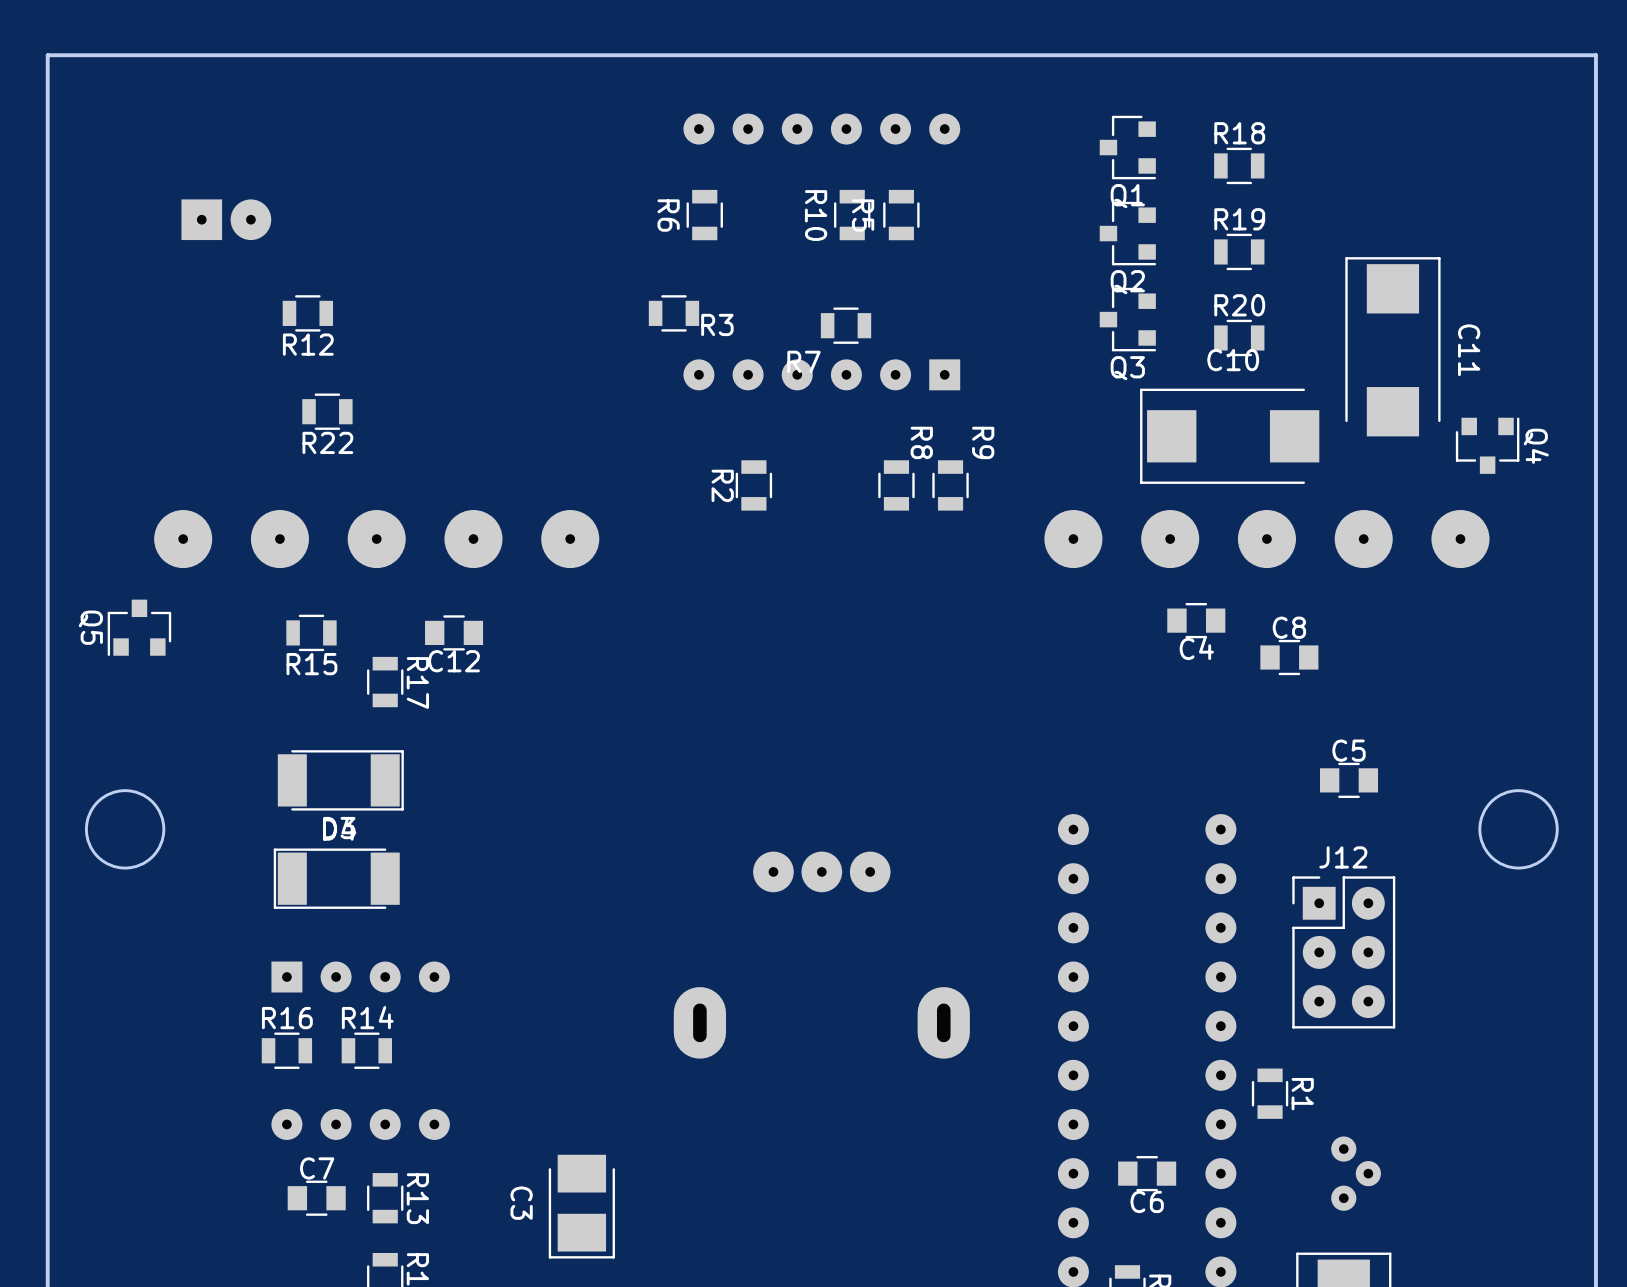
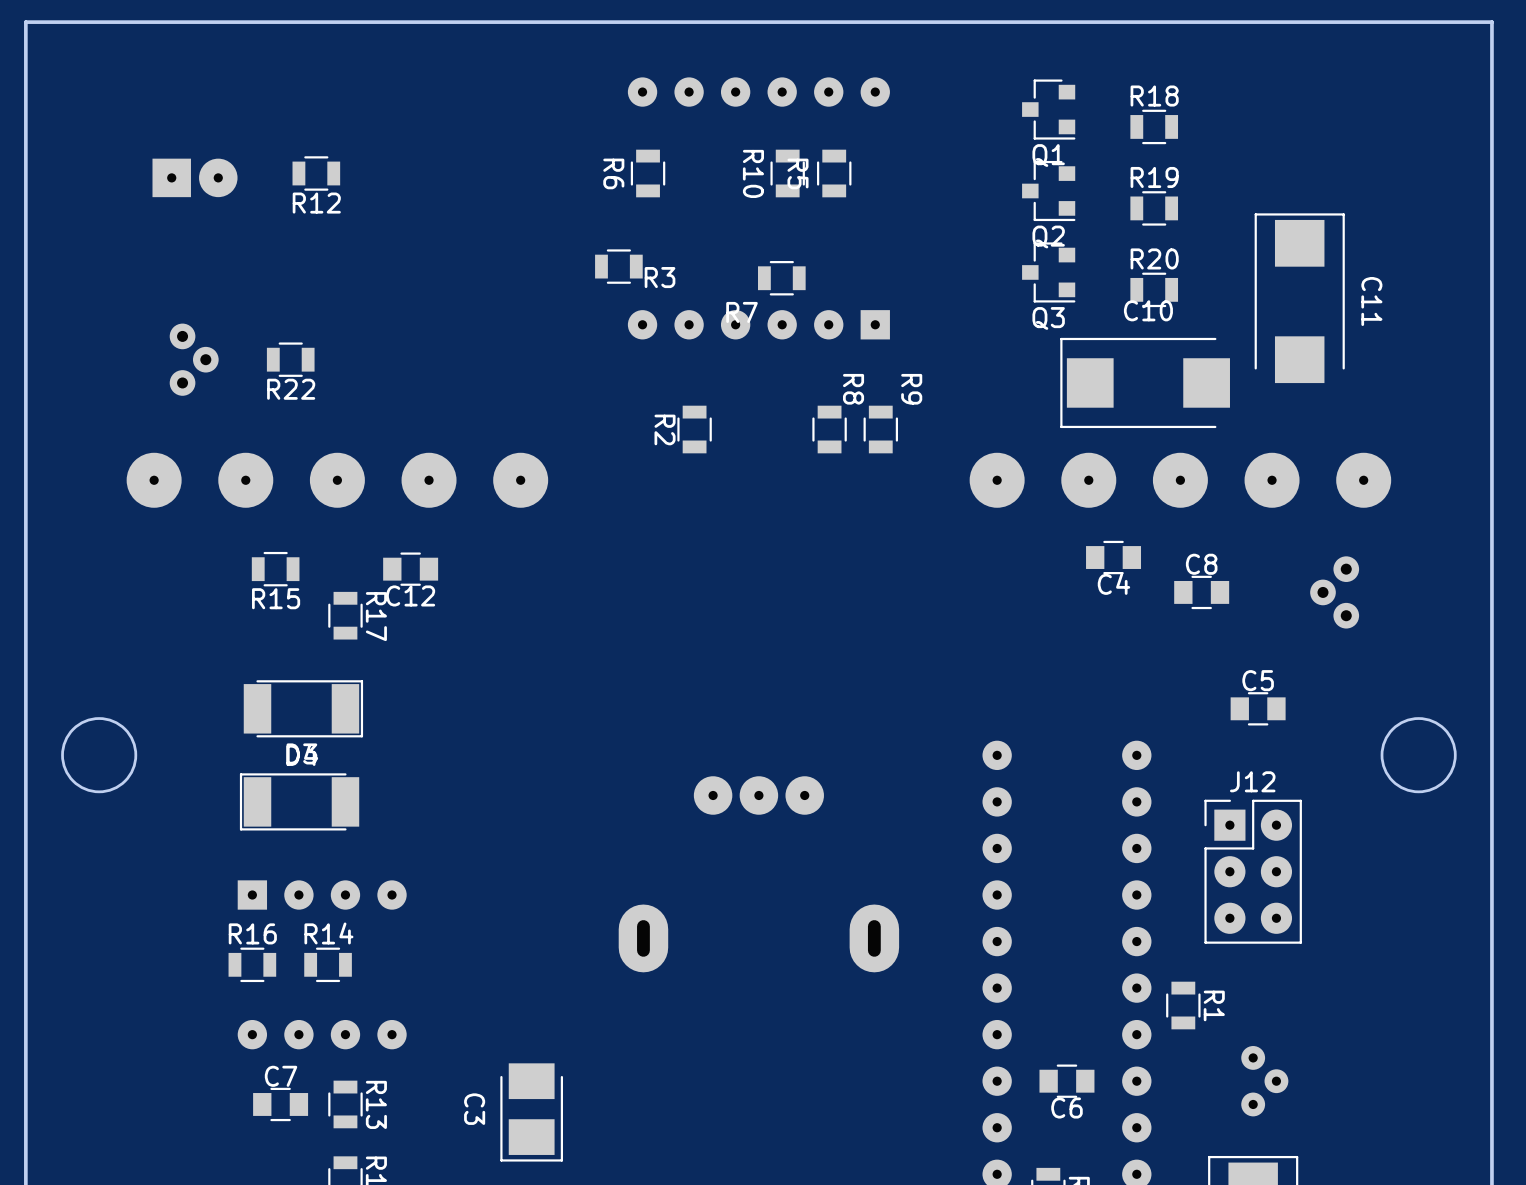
R12 position: (307, 313) -> (316, 173)
part: none -> (194, 359)
Q4: (1487, 445) -> none
Q5: (139, 627) -> none
part: none -> (1334, 592)

